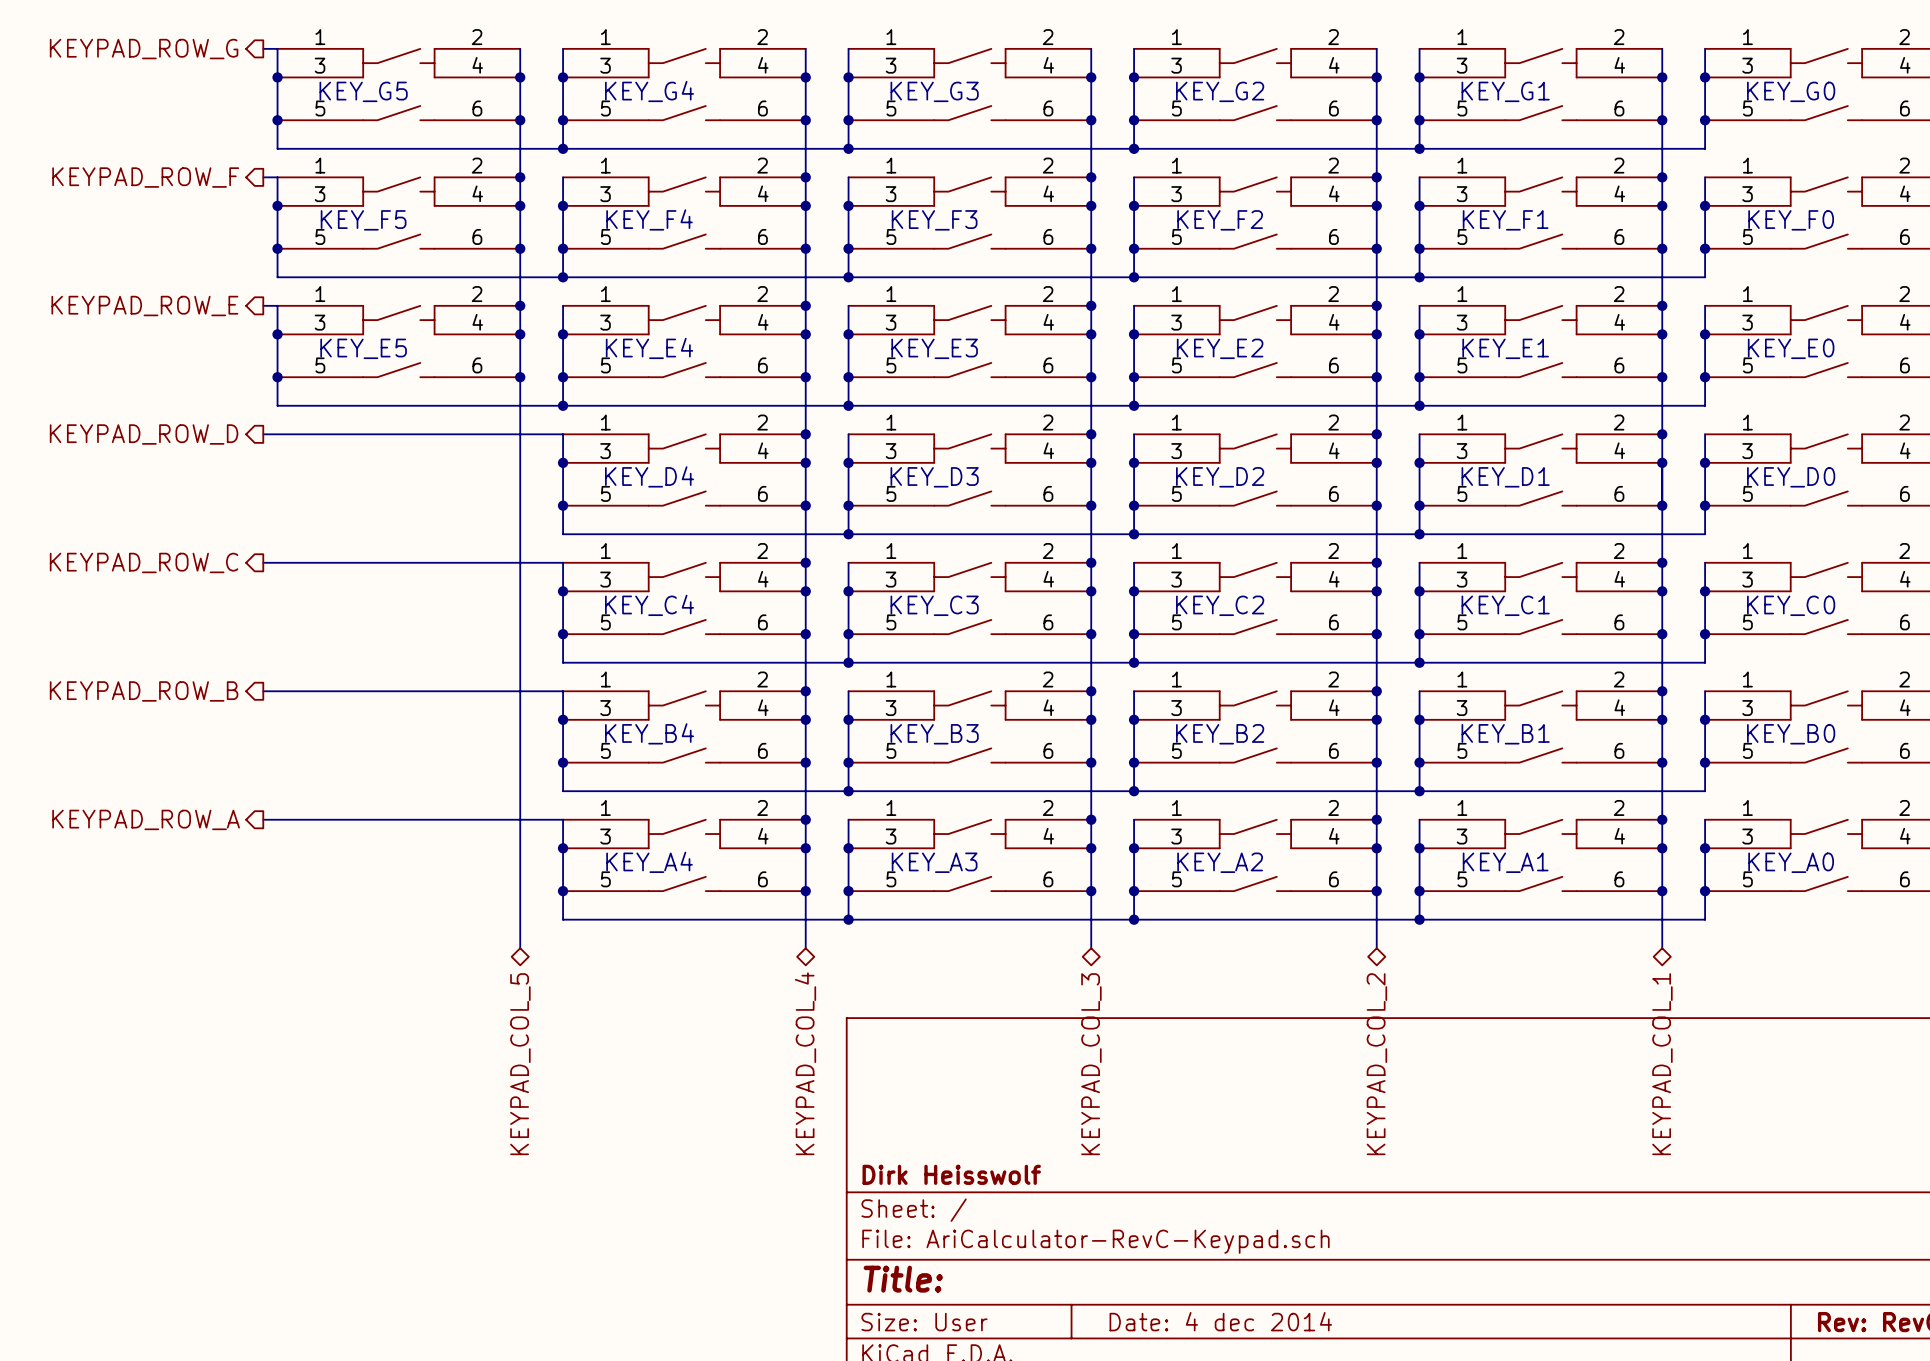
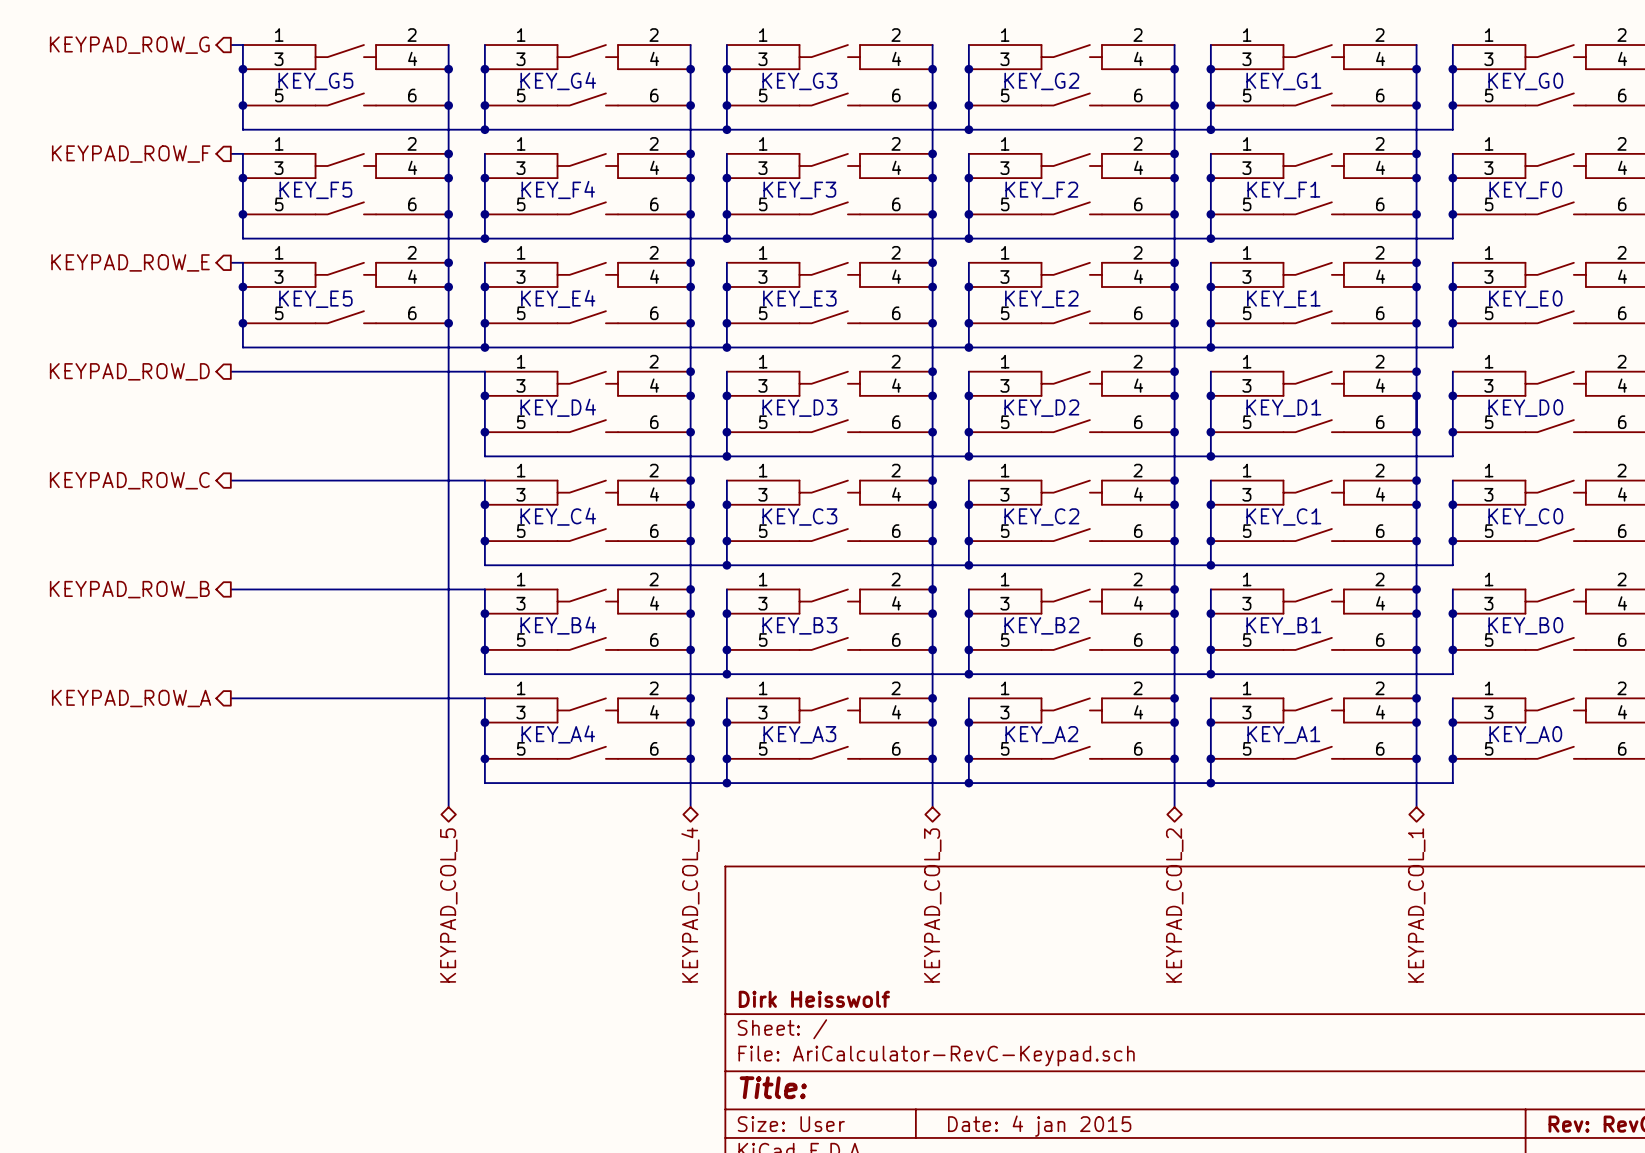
title block: Date: 4 dec 2014 (1220, 1321) -> Date: 4 jan 2015 (1039, 1126)

